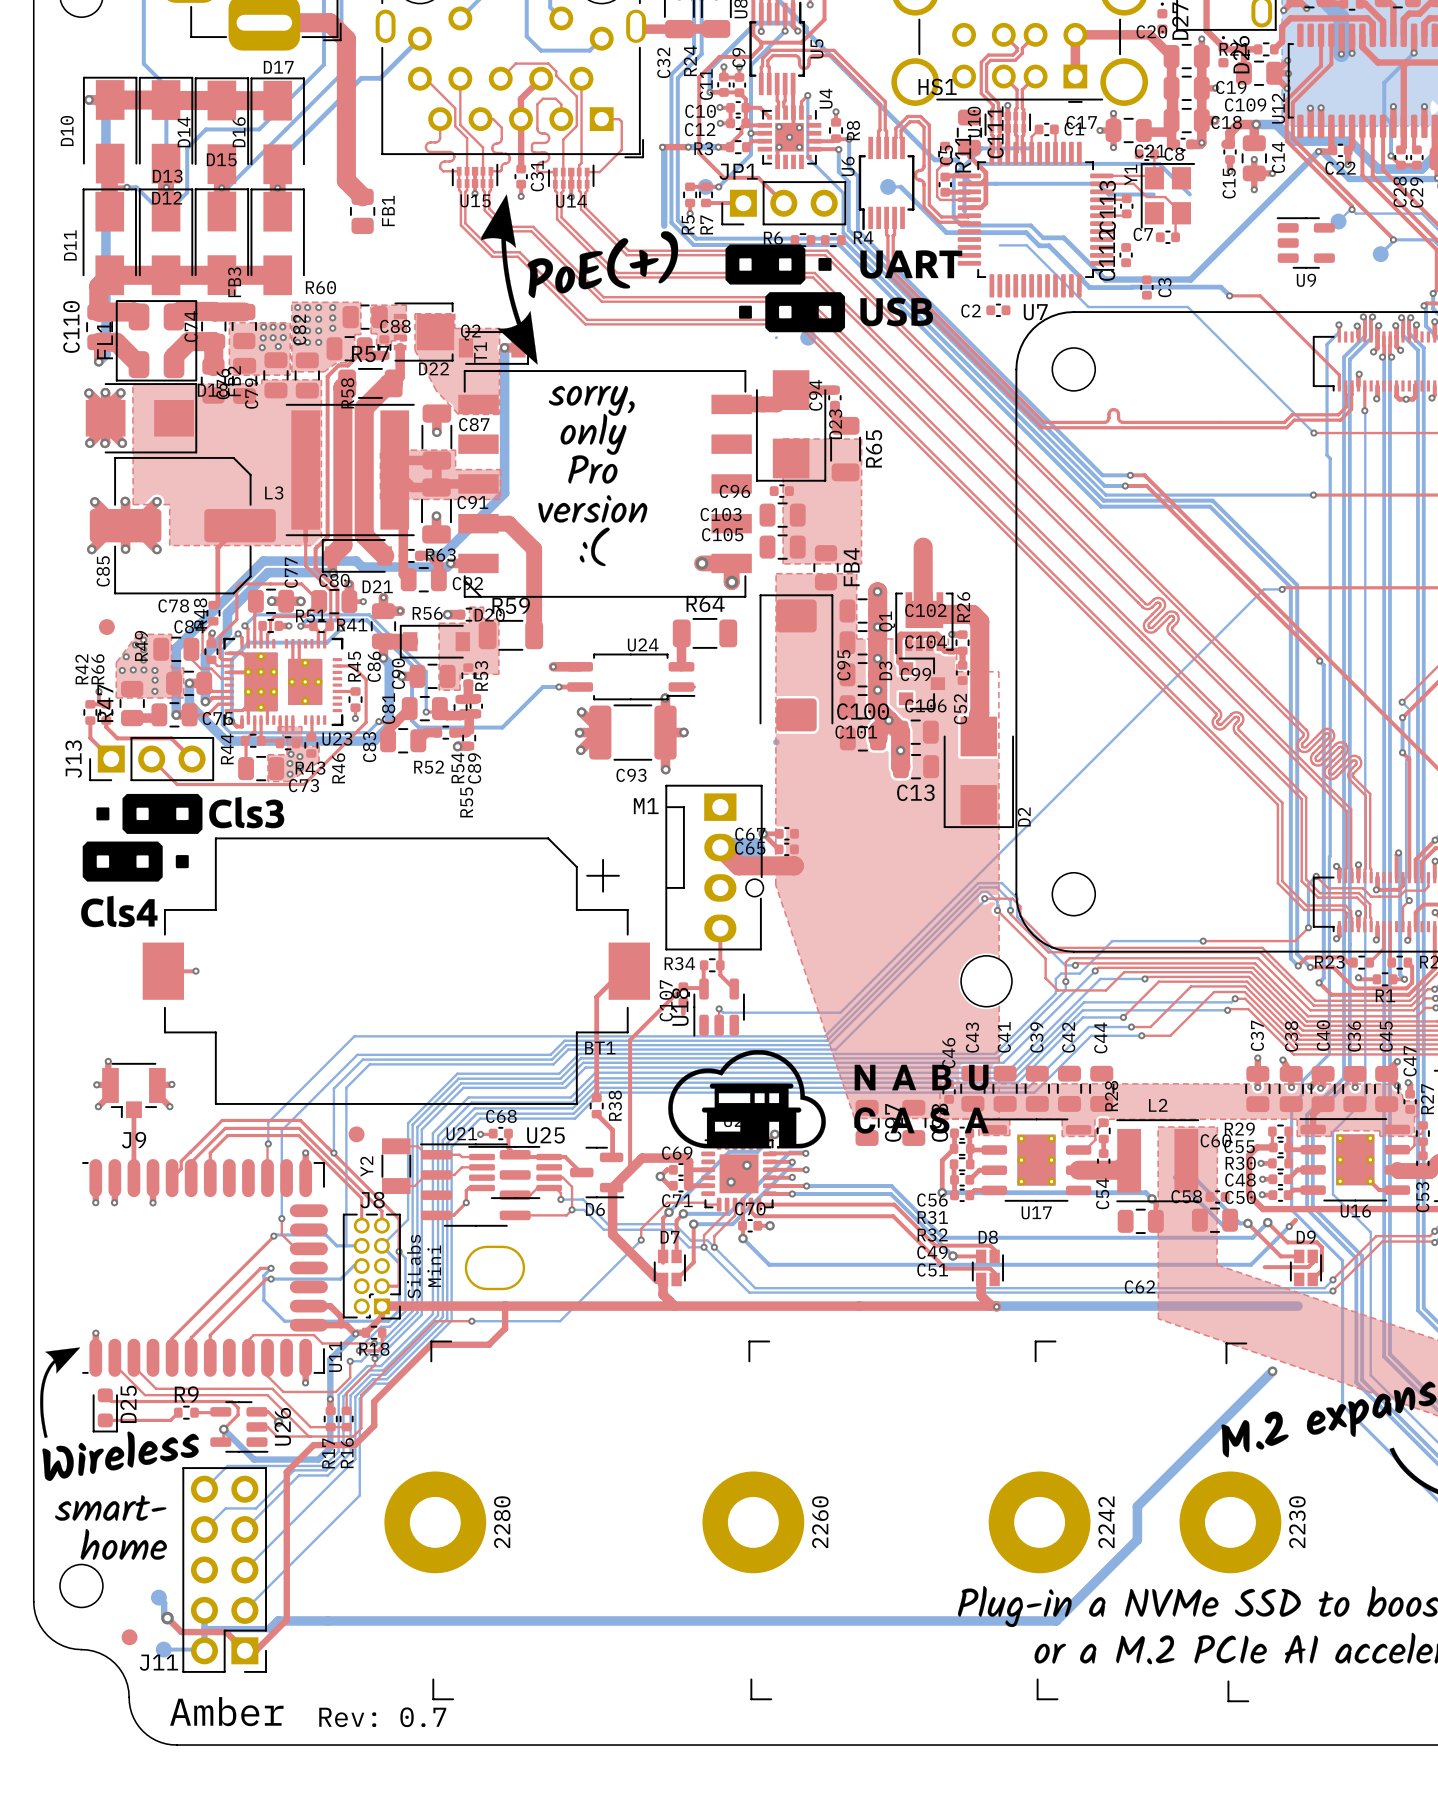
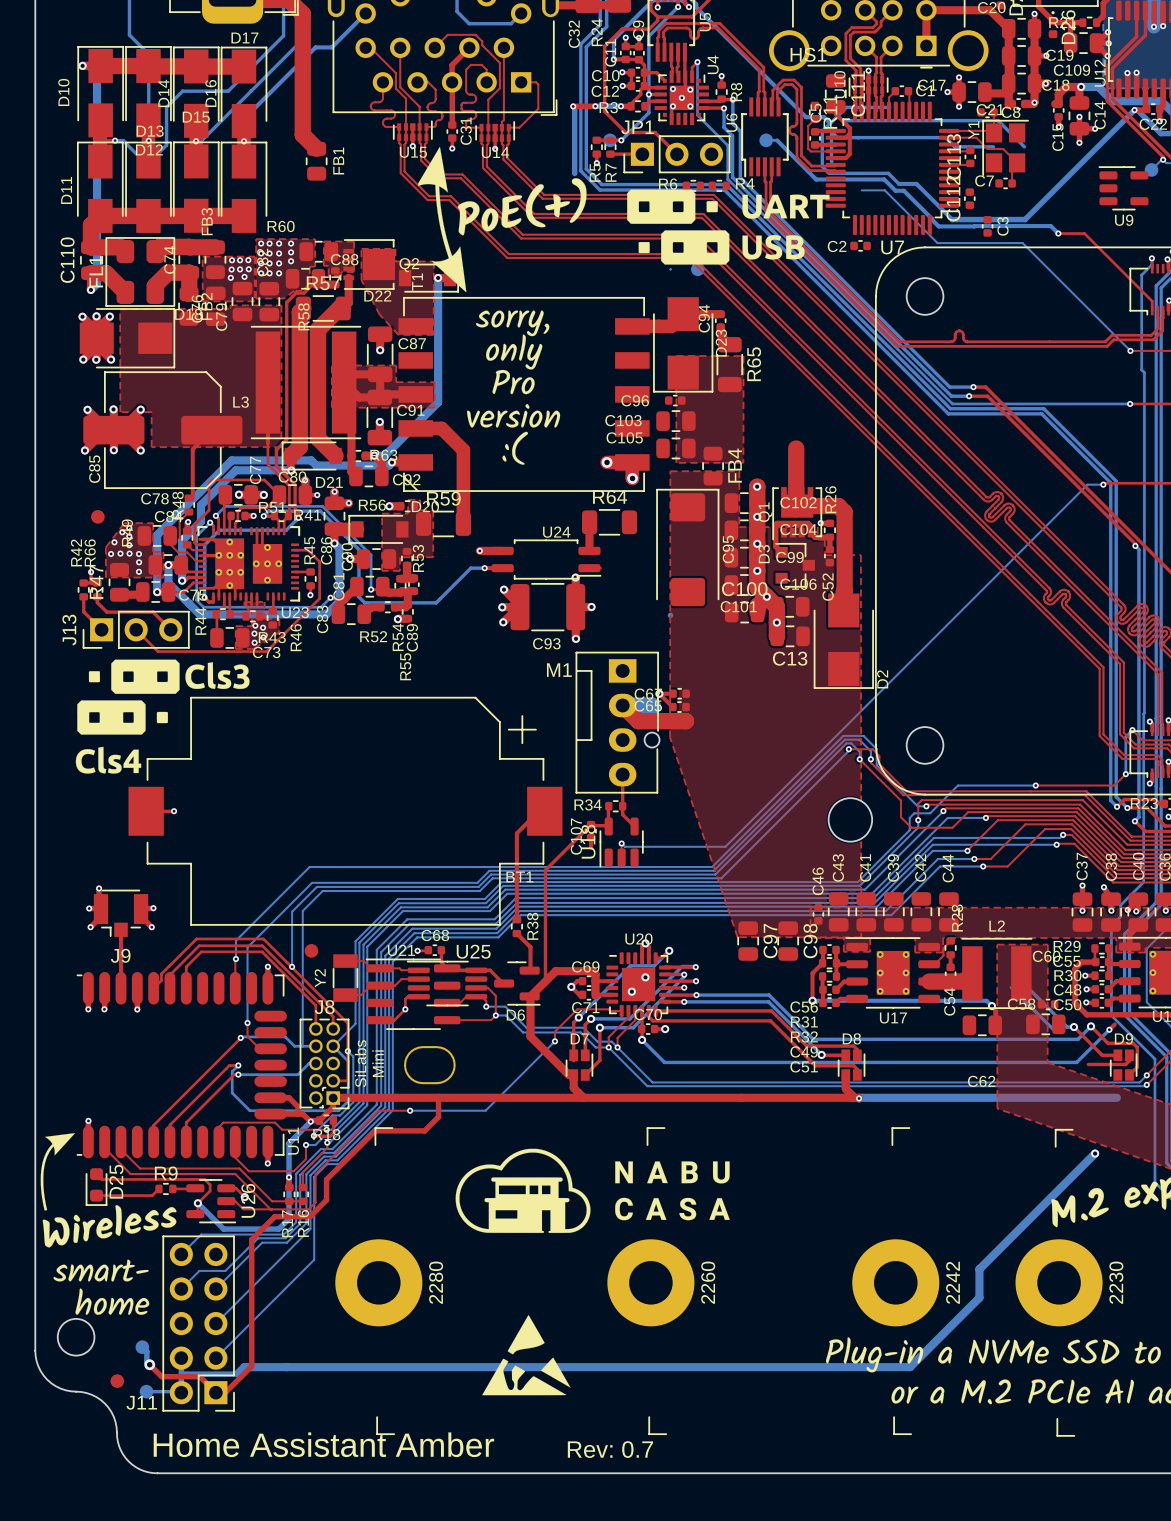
drawing position: (828, 1099) -> (592, 1190)
drawing: none -> [482, 1315, 571, 1396]
text: Amber (226, 1711) -> Home Assistant Amber (323, 1444)
text position: Rev: 0.7 (382, 1717) -> Rev: 0.7 (610, 1449)

